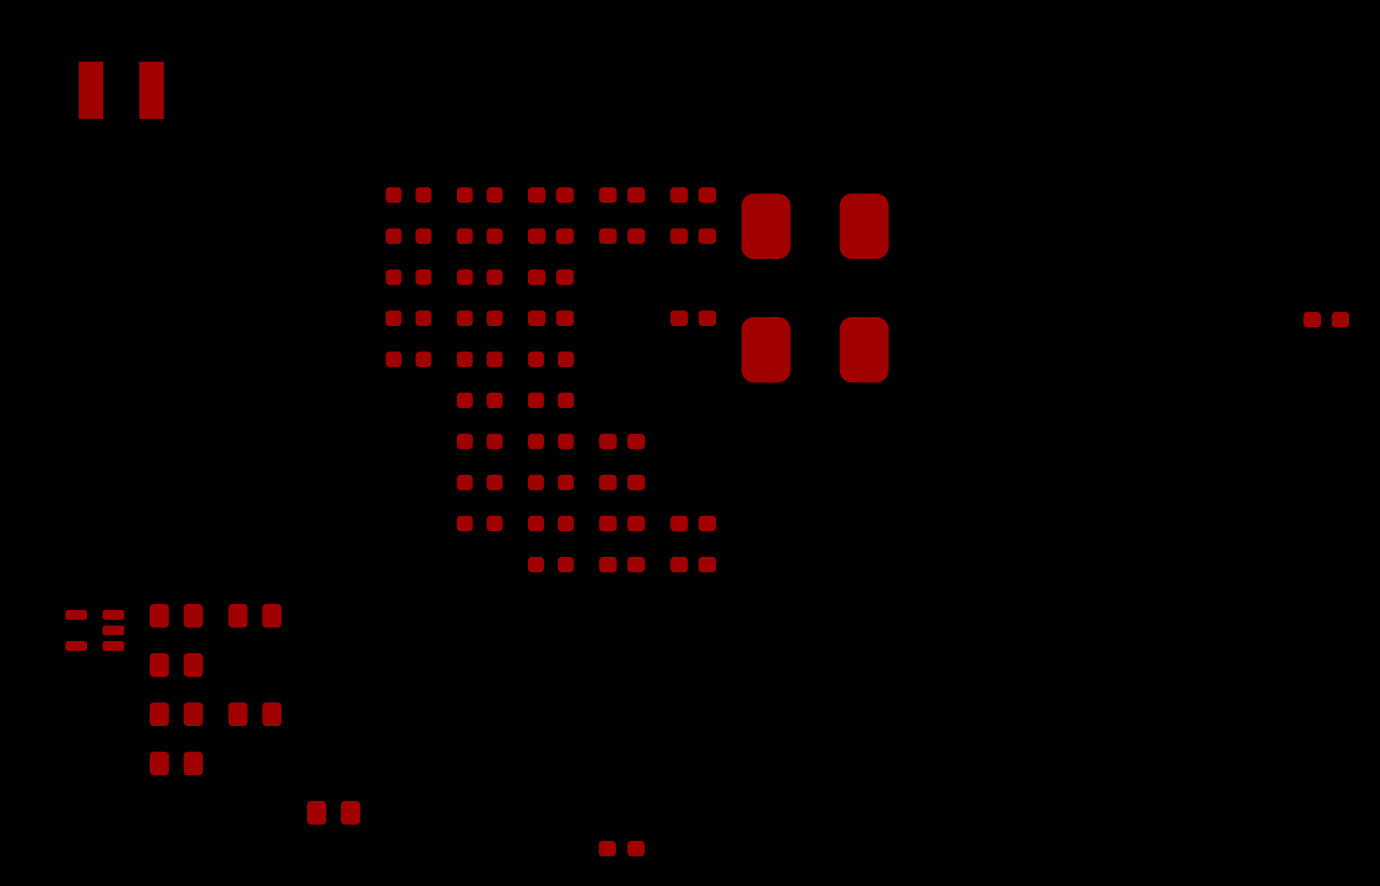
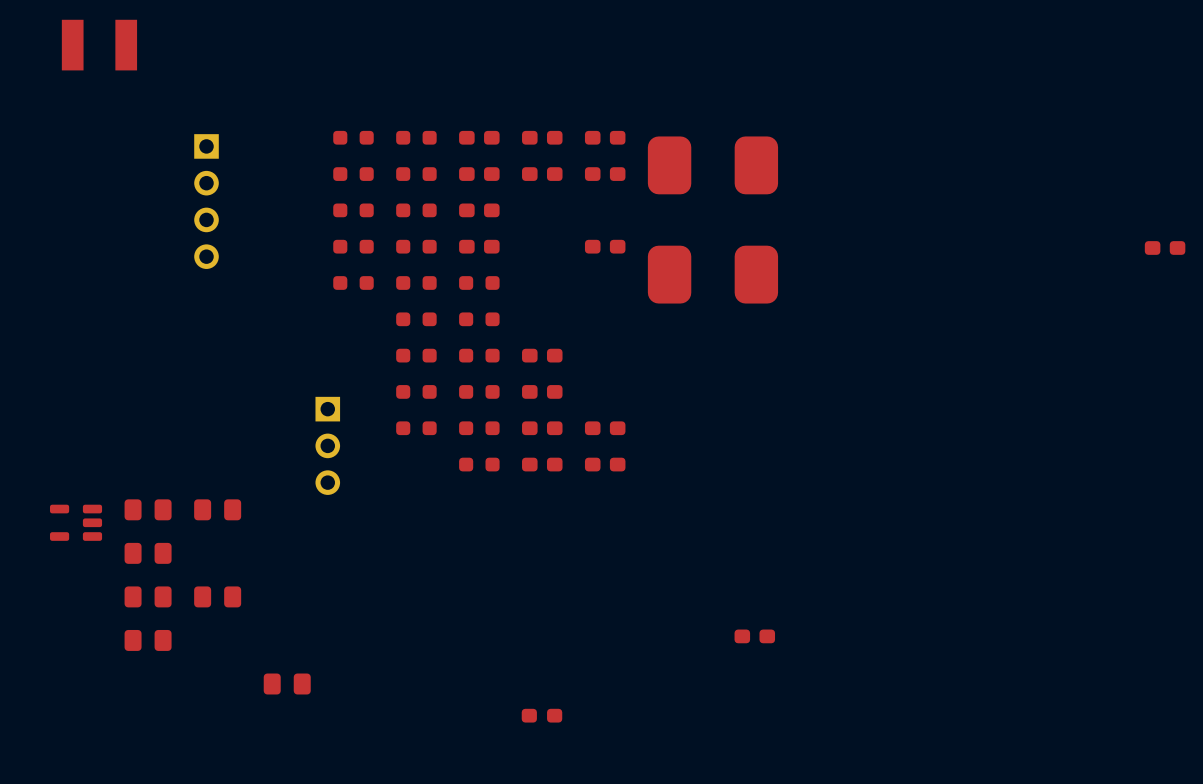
part: none -> (206, 201)
part: none -> (327, 445)
part: none -> (754, 636)

